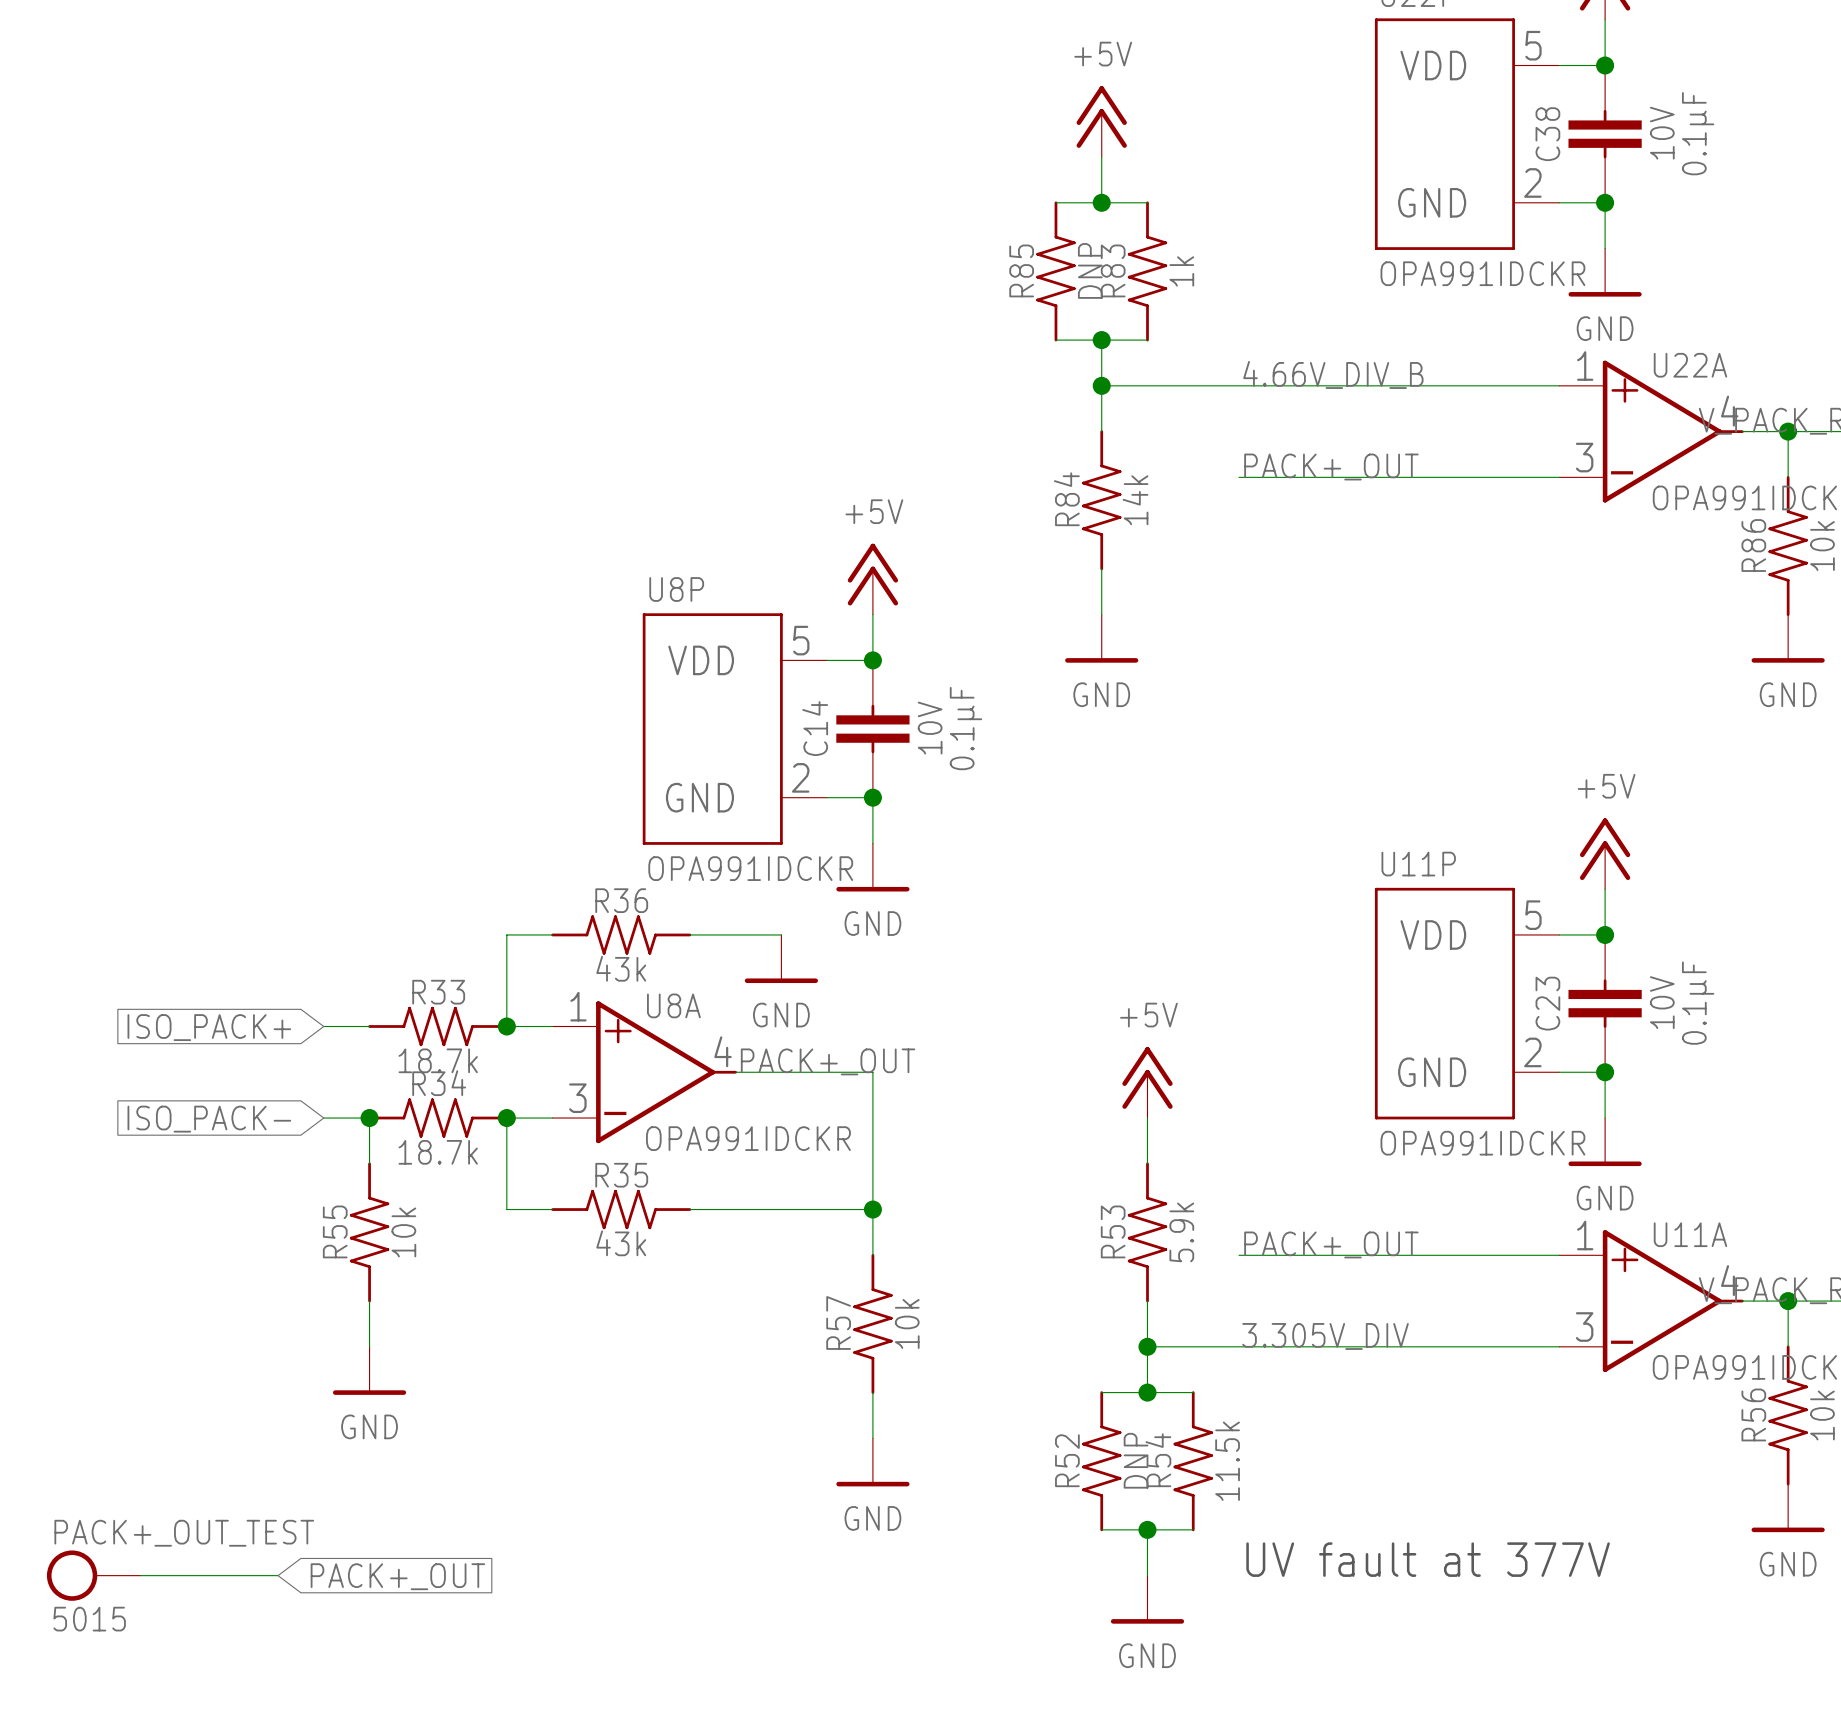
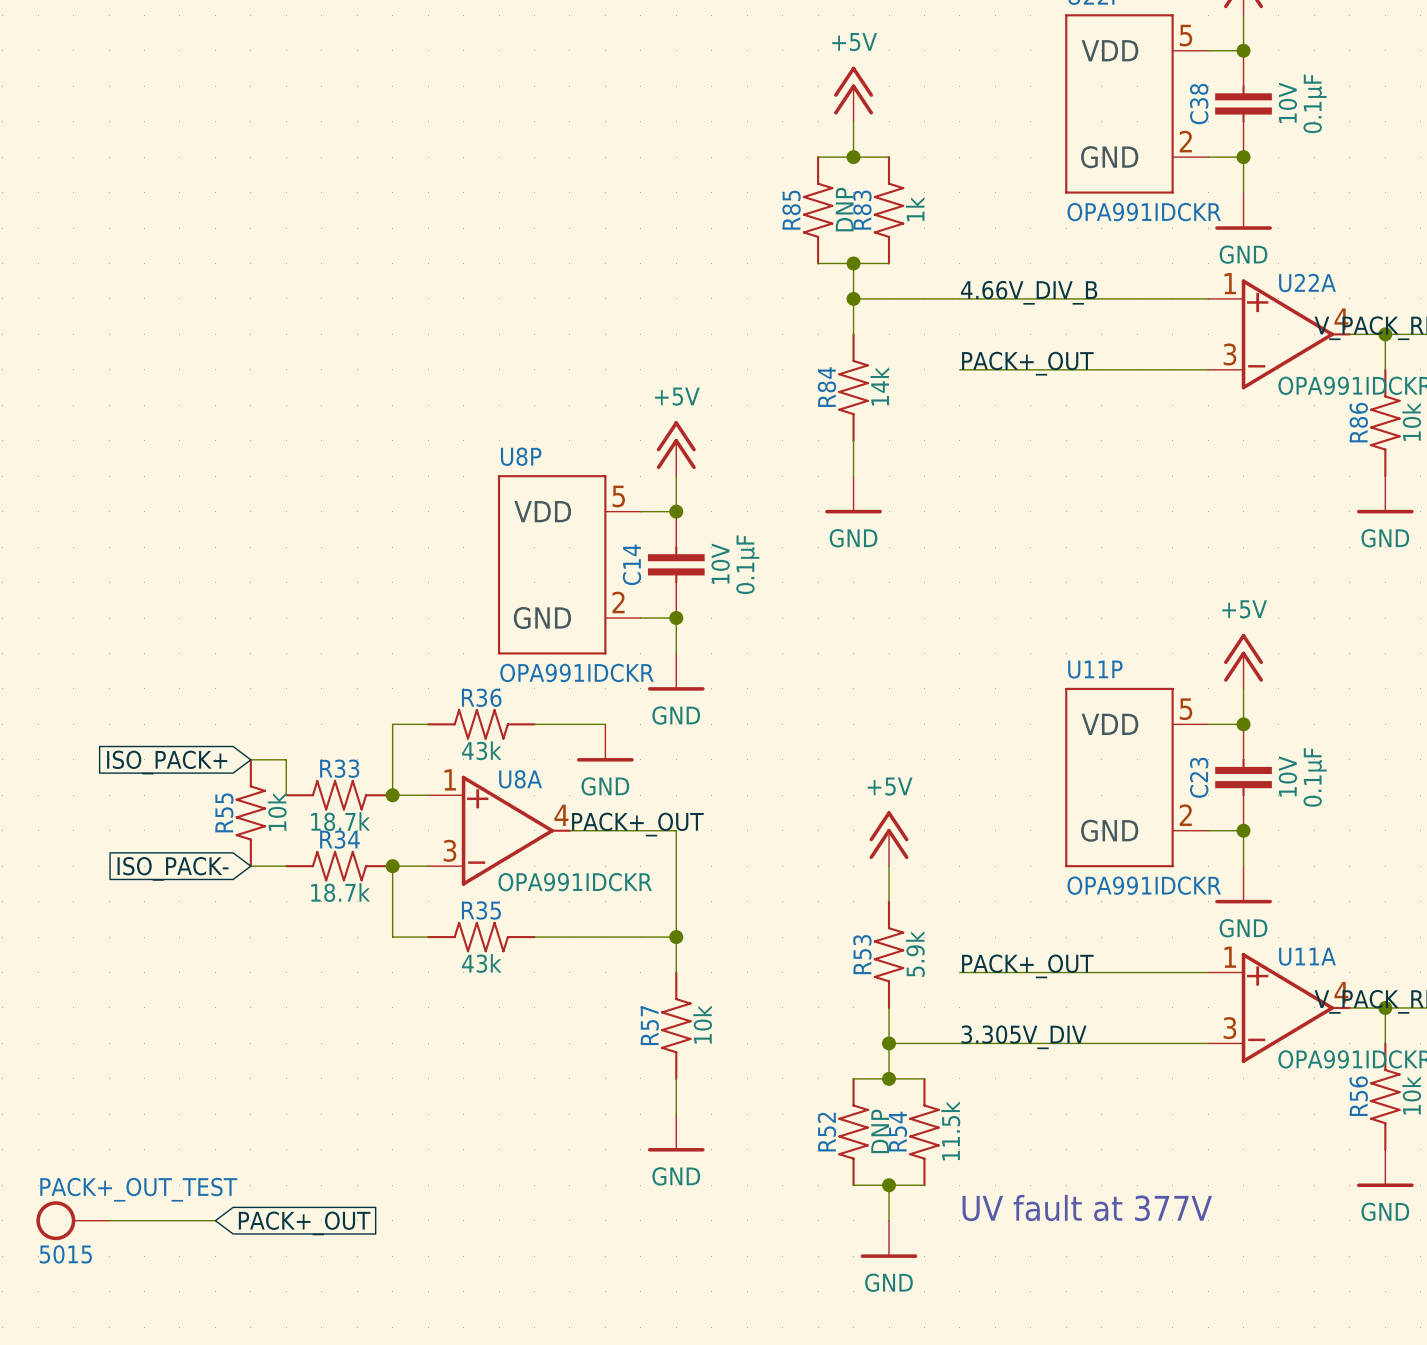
wire: (323, 1026) (369, 1026) -> (250, 759) (286, 759) (286, 795)
global label position: ISO_PACK+ (209, 1027) -> ISO_PACK+ (167, 762)
wire: (369, 1118) (369, 1163) -> none
junction: (369, 1118) -> none
R55 position: (369, 1232) -> (250, 812)
wire: (369, 1301) (369, 1346) -> none
power symbol: GND (369, 1370) -> none

